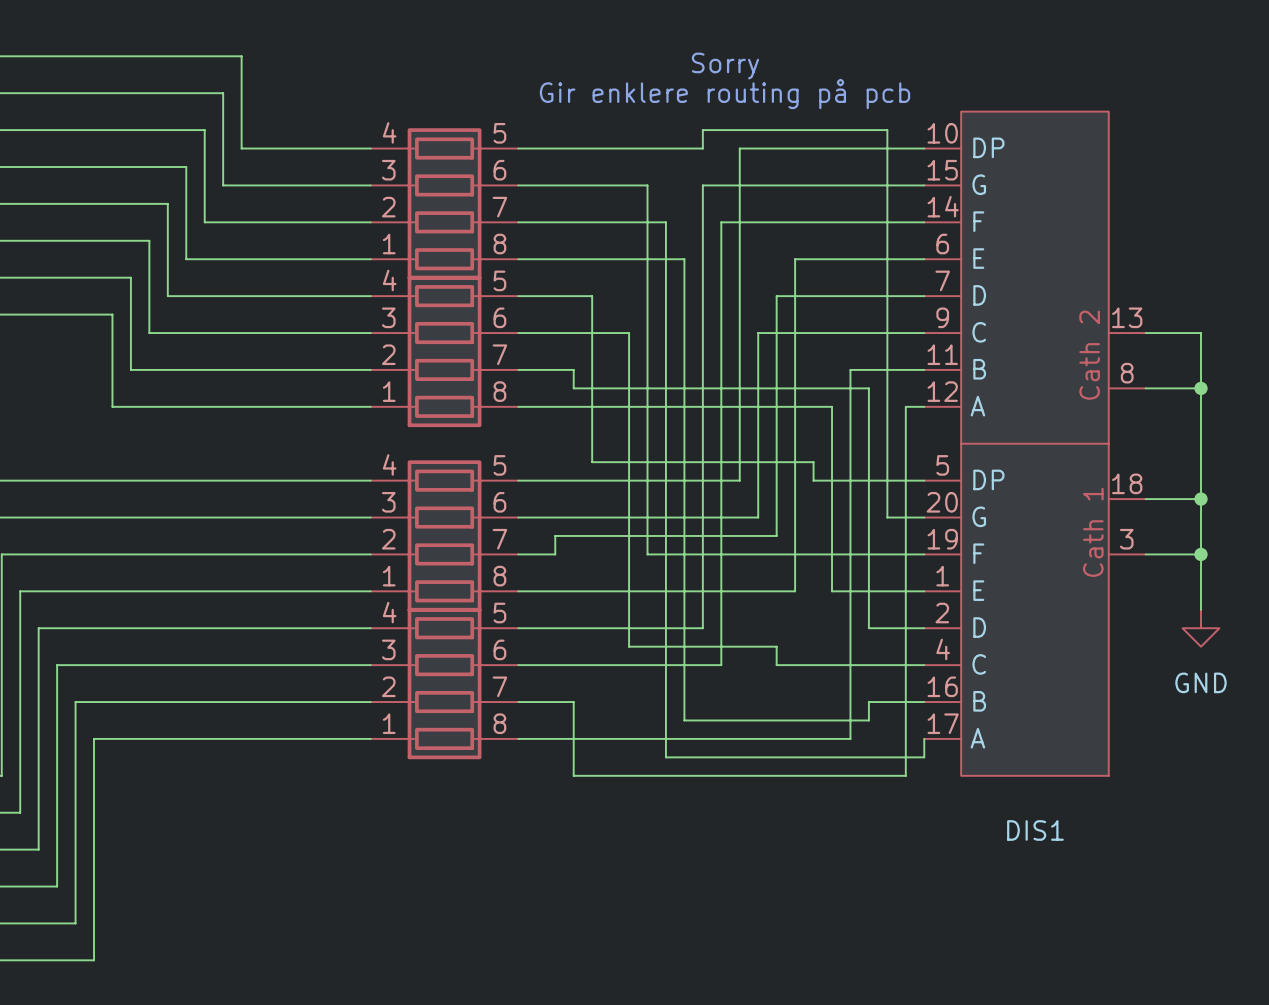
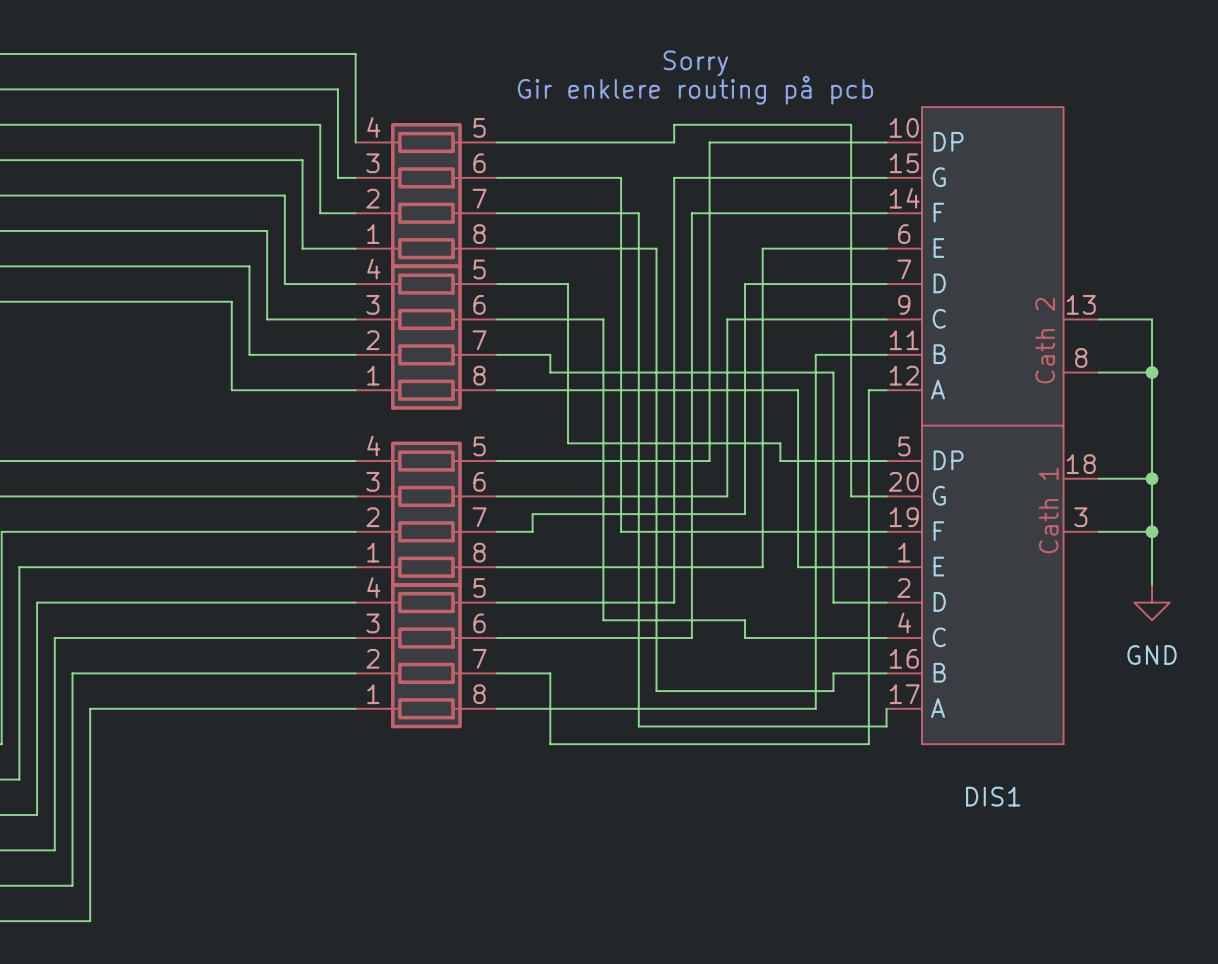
wire: (241, 56) (241, 148) (370, 148) -> (231, 53) (355, 53) (355, 142)
wire: (223, 93) (223, 185) (352, 185) -> (214, 89) (337, 89) (337, 177)
wire: (204, 130) (204, 222) (333, 222) -> (196, 124) (320, 124) (320, 213)
wire: (186, 166) (186, 259) (315, 259) -> (178, 160) (302, 160) (302, 248)
wire: (167, 203) (167, 296) (296, 296) -> (160, 195) (284, 195) (284, 284)
wire: (149, 240) (149, 333) (278, 333) -> (143, 230) (267, 230) (267, 319)
wire: (130, 277) (130, 369) (260, 369) -> (125, 266) (249, 266) (249, 354)
wire: (112, 314) (112, 406) (241, 406) -> (107, 301) (231, 301) (231, 390)

